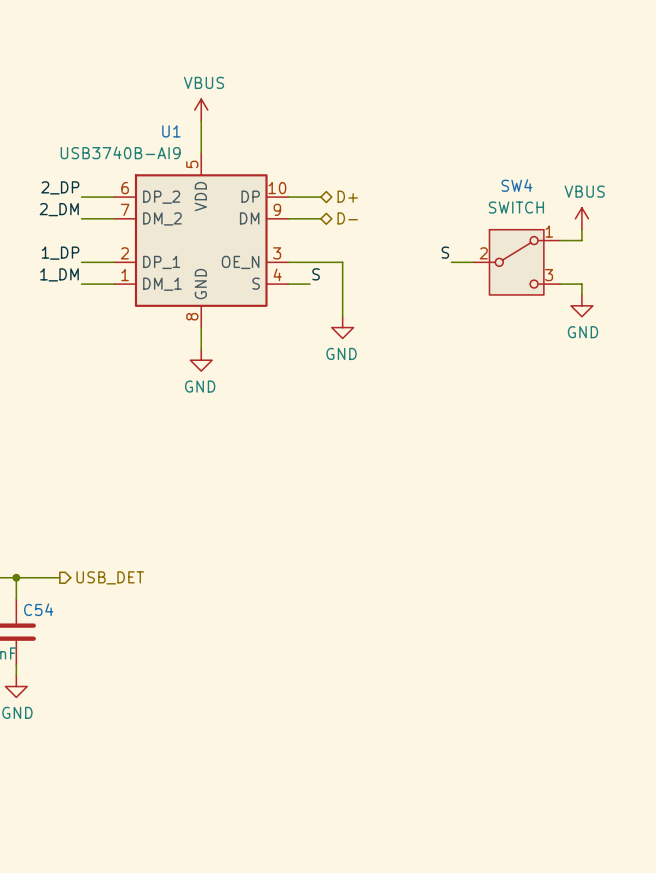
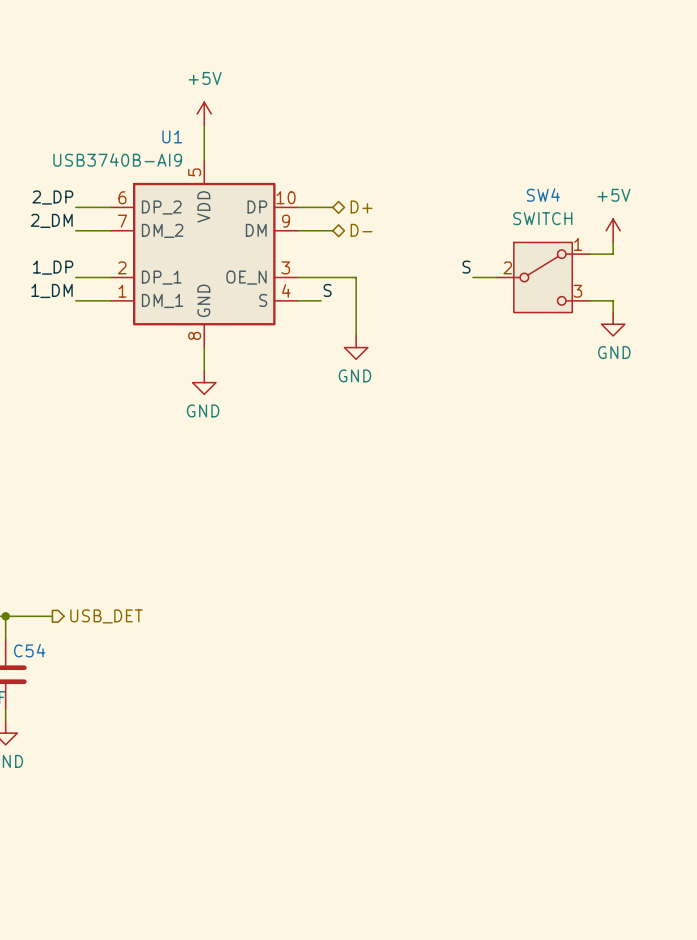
power symbol: VBUS (201, 110) -> +5V (204, 113)
power symbol: VBUS (581, 218) -> +5V (613, 230)

